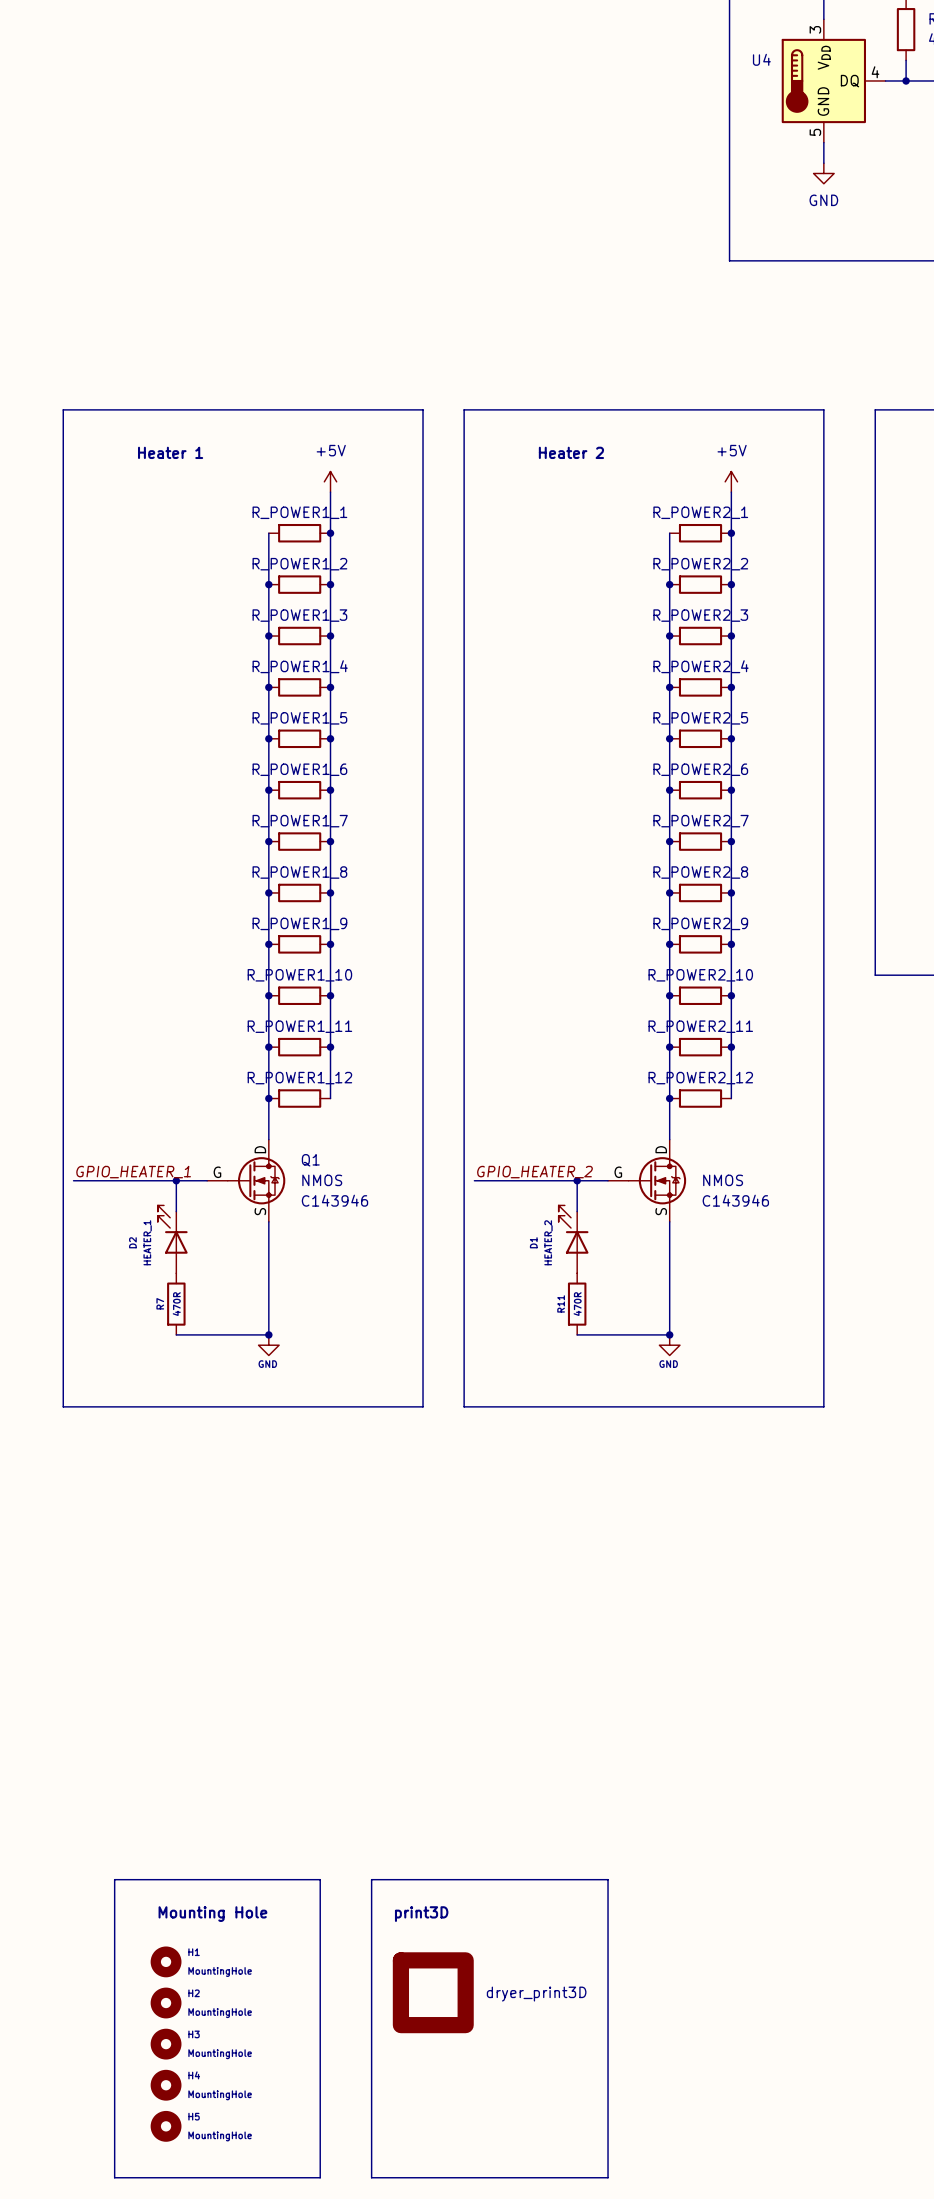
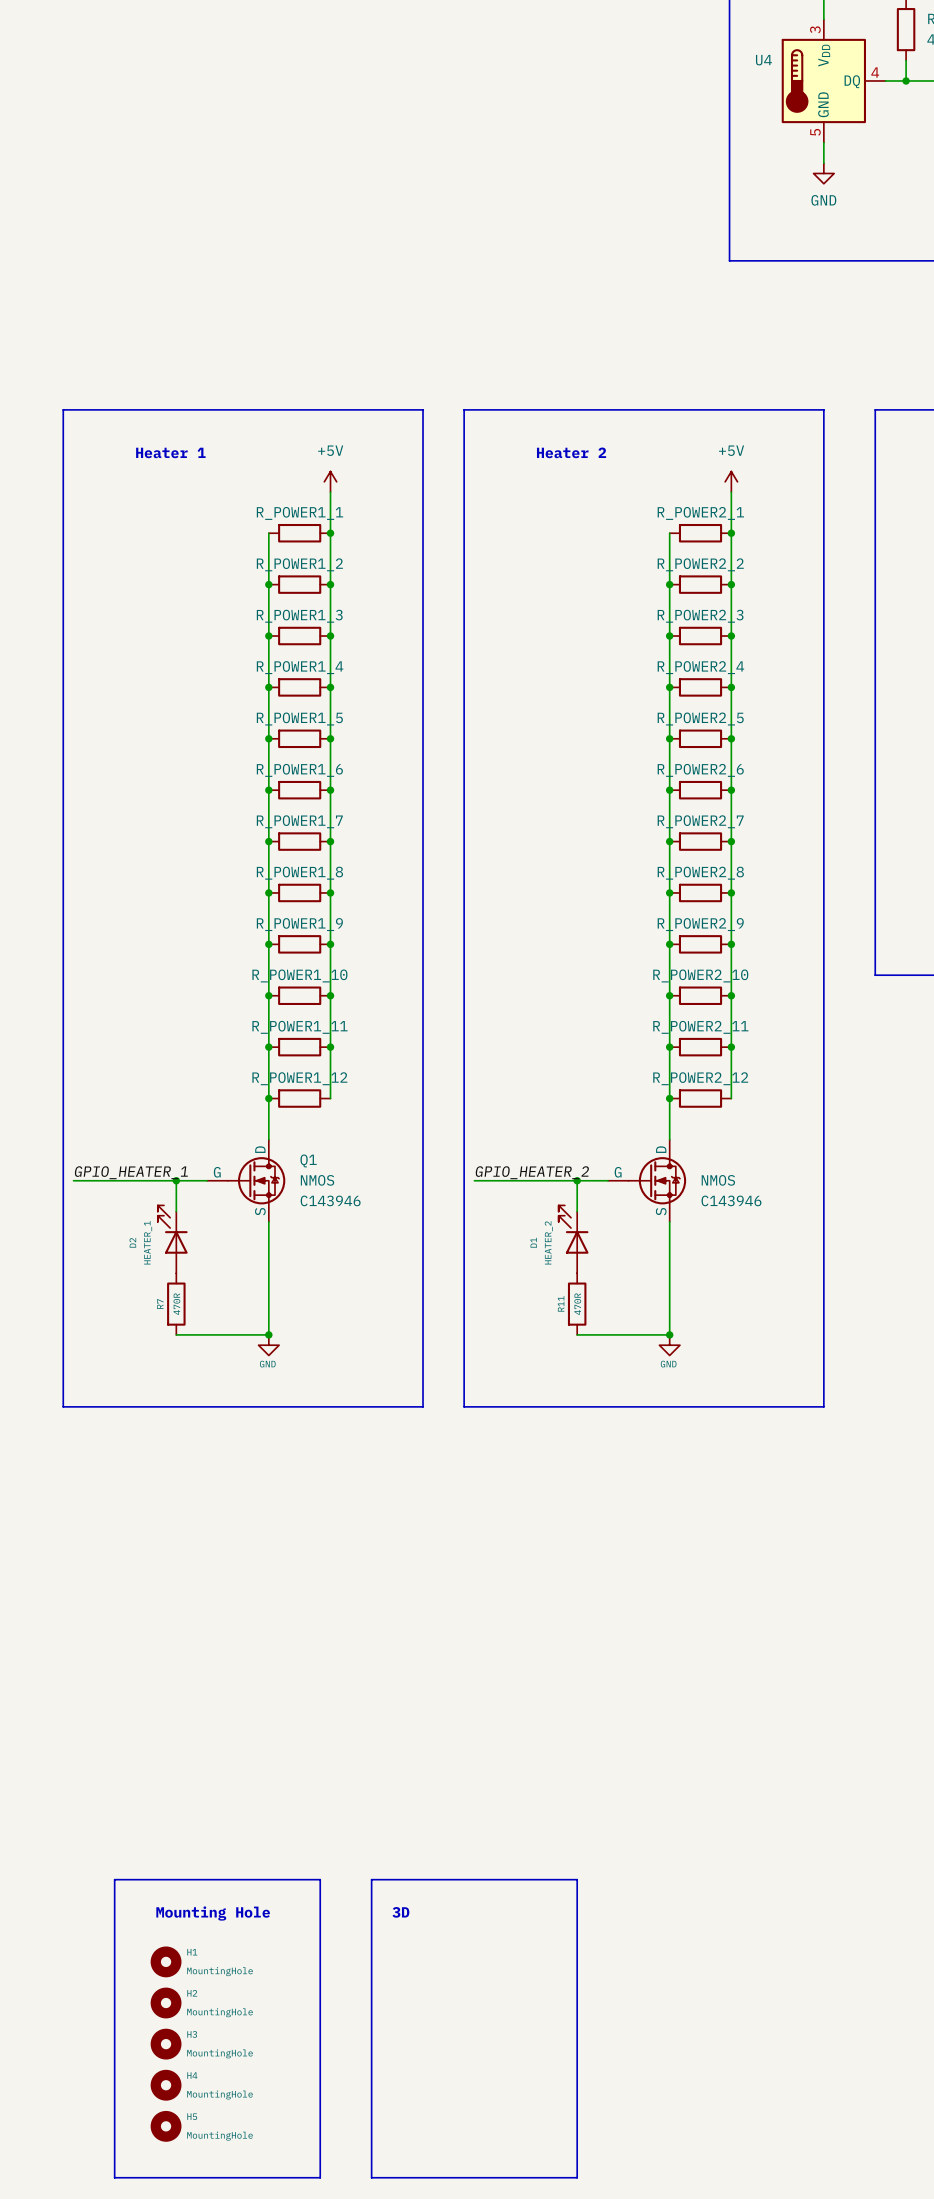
line: (577, 1879) (608, 1879) (608, 2177) (577, 2177) -> (577, 1879) (577, 2177)
text: print3D (421, 1914) -> 3D (400, 1912)
part: dryer_print3D (433, 1992) -> none

